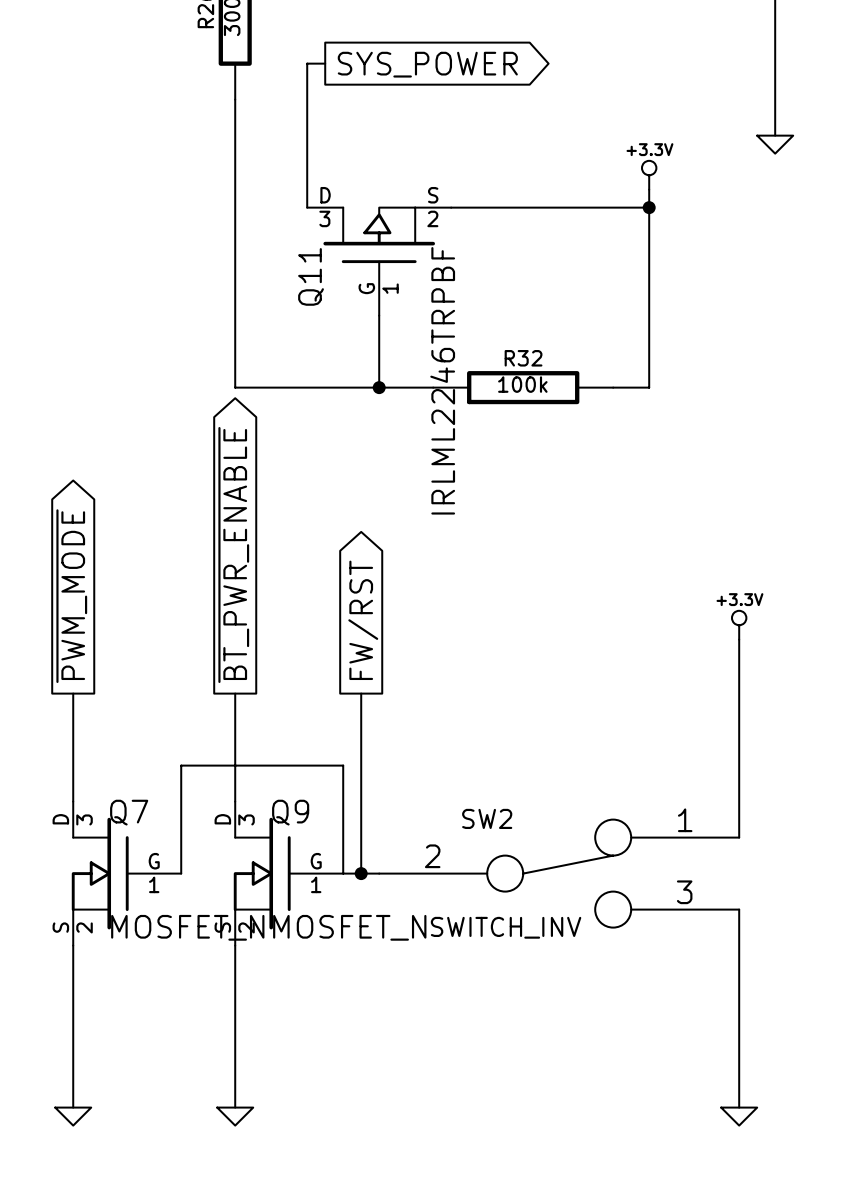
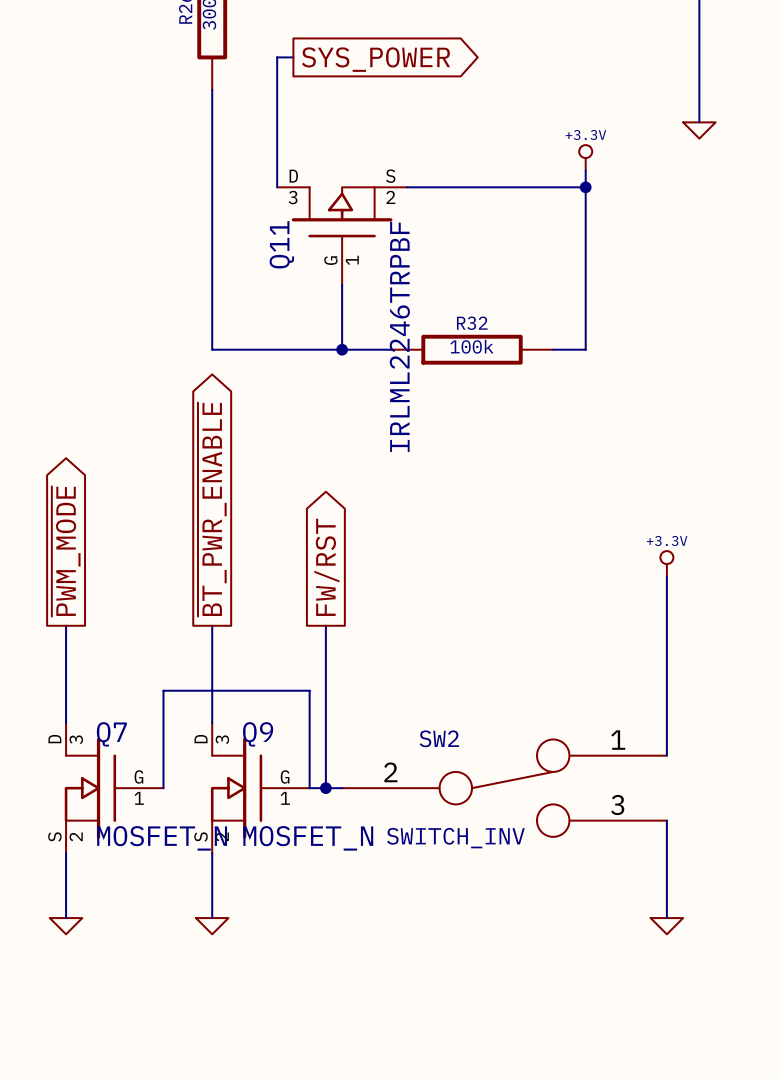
wire: (73, 1017) (73, 1107) -> none
wire: (235, 1017) (235, 1107) -> none
wire: (739, 1017) (739, 1107) -> none
power symbol position: (73, 1116) -> (66, 926)
power symbol position: (235, 1116) -> (212, 926)
power symbol position: (739, 1116) -> (666, 926)

